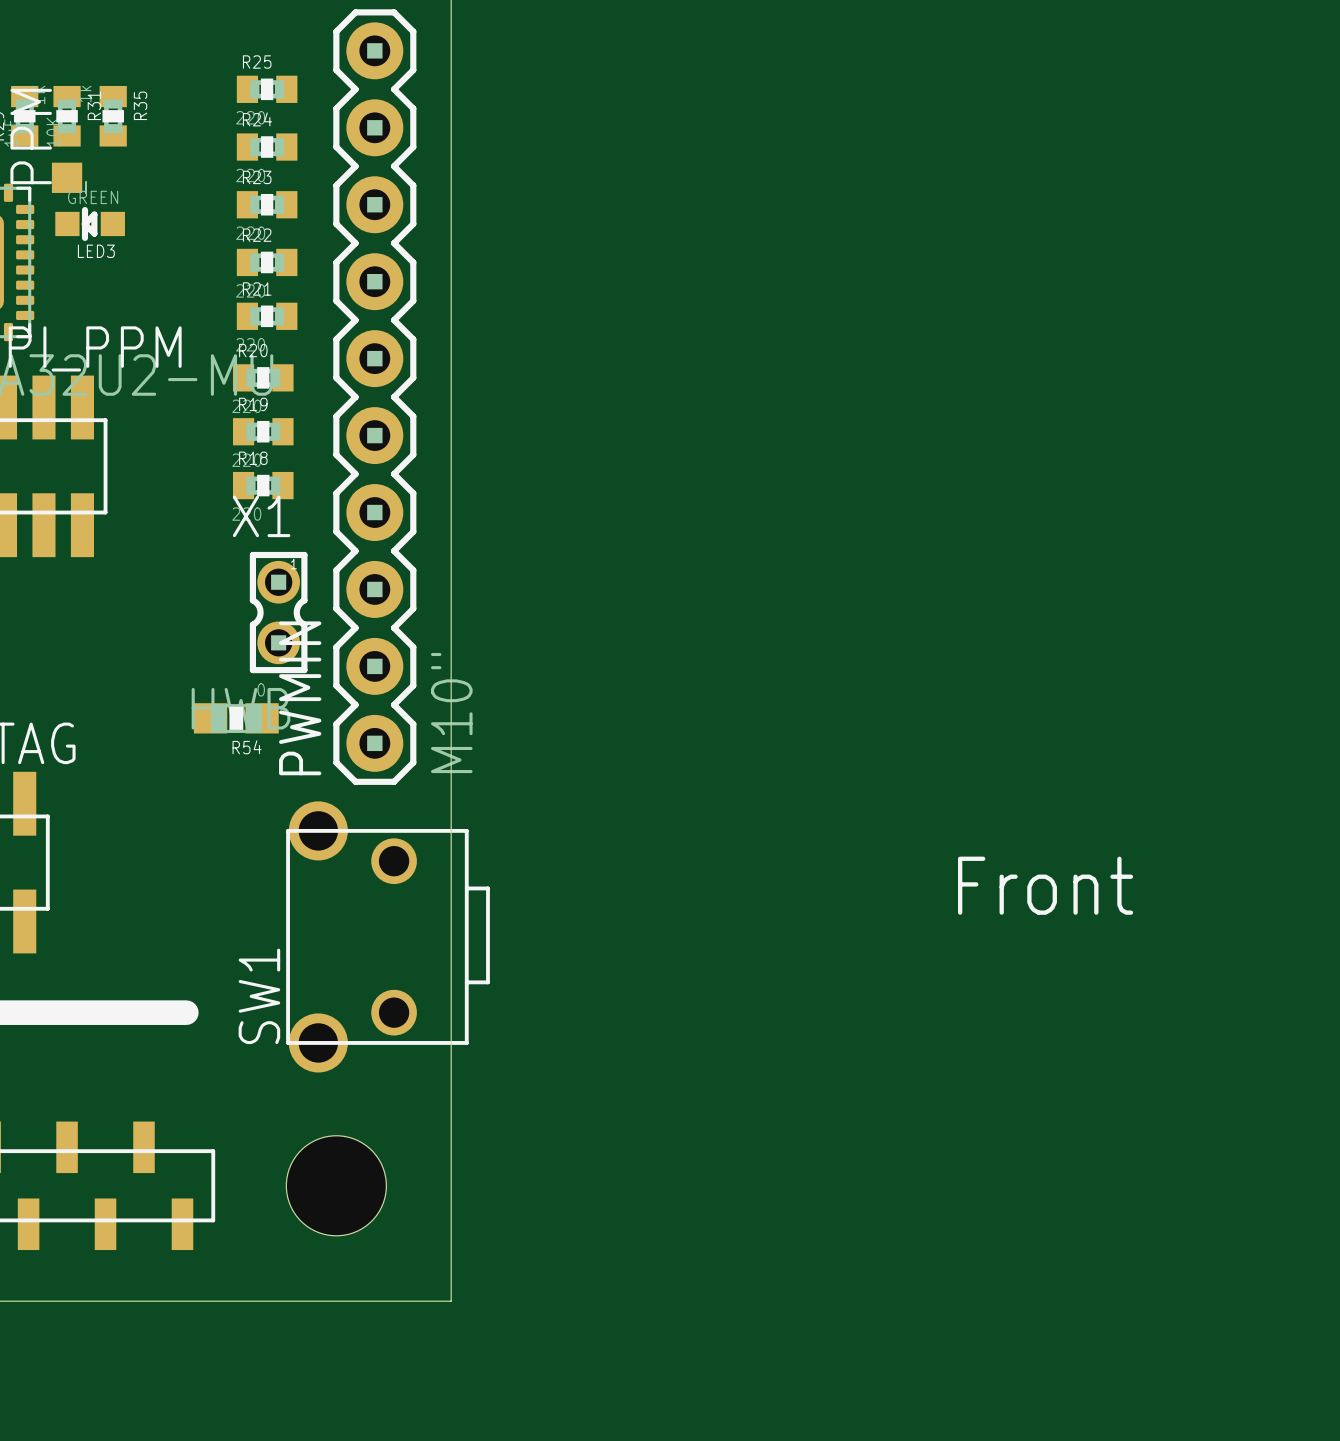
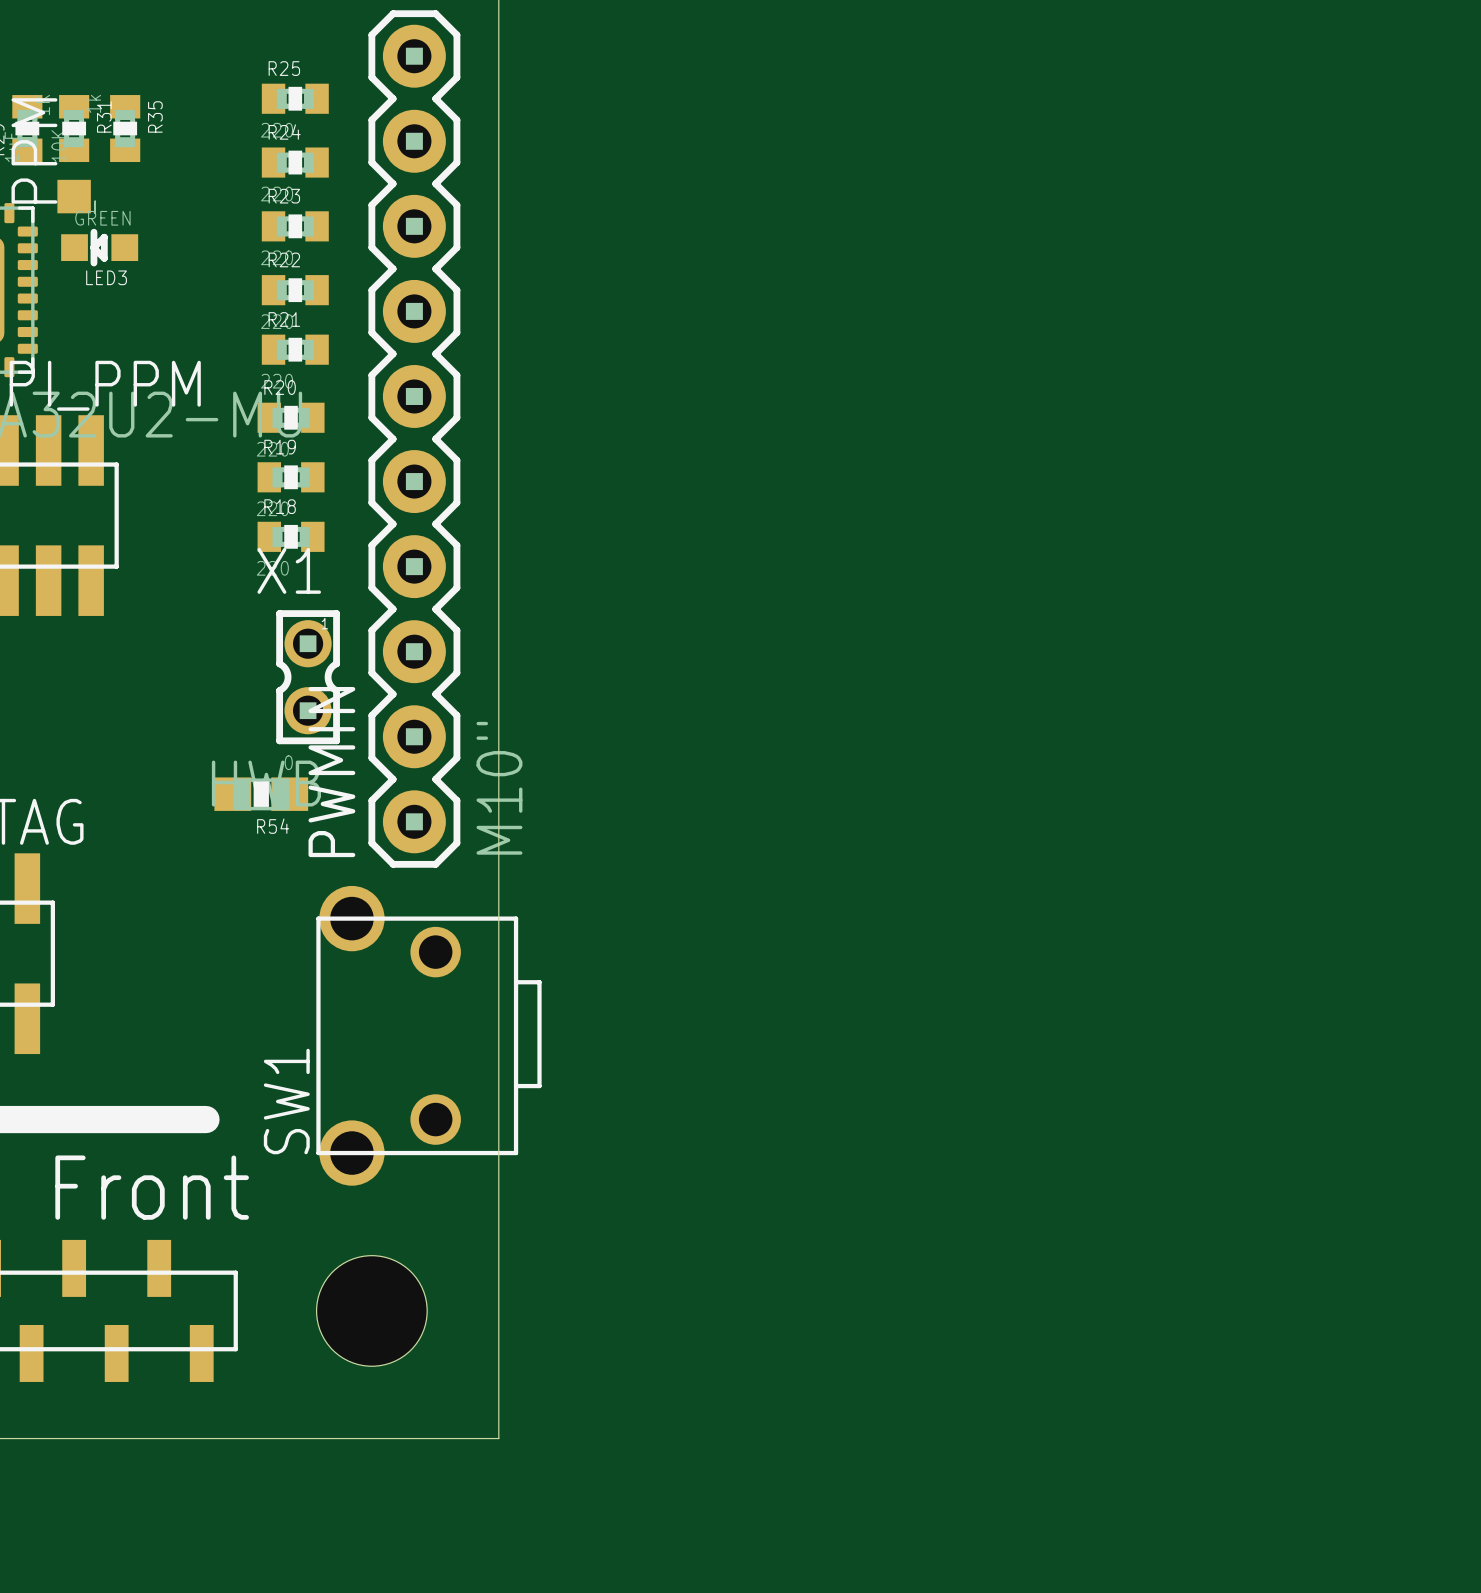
text: Front (1045, 885) -> none
text: none -> Front (152, 1187)

